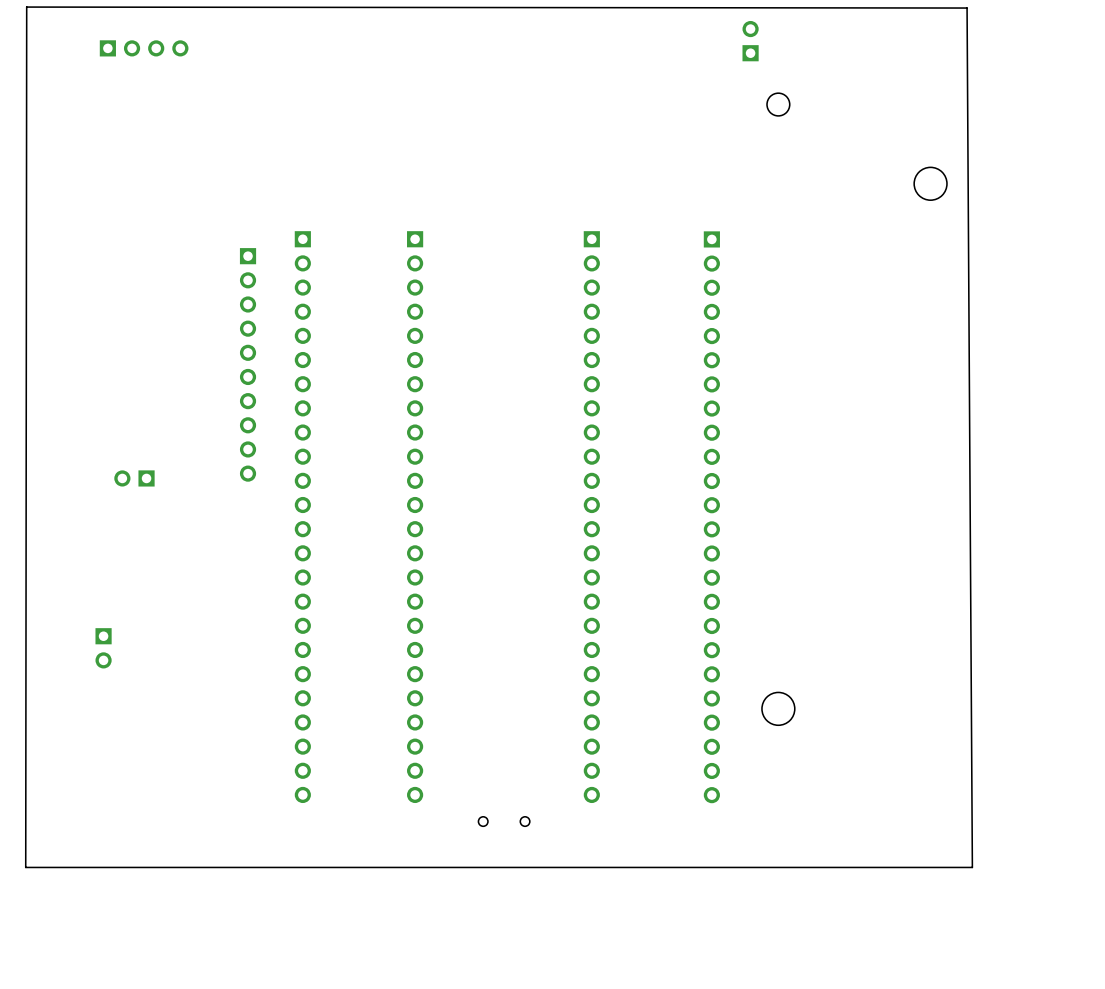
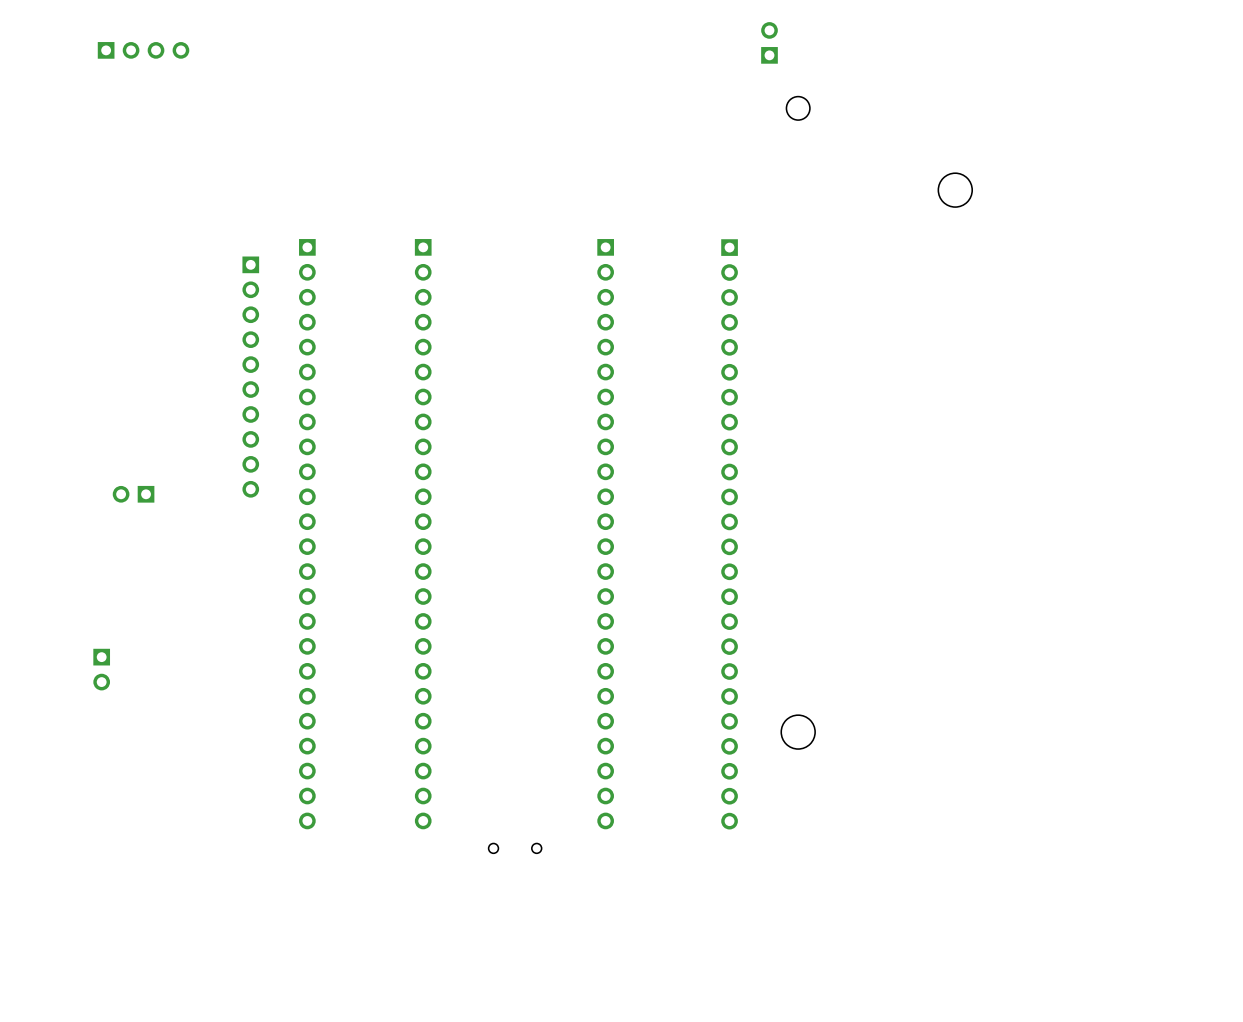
board edge: (26, 7) (967, 8) (972, 867) (25, 867) (26, 7) -> none

